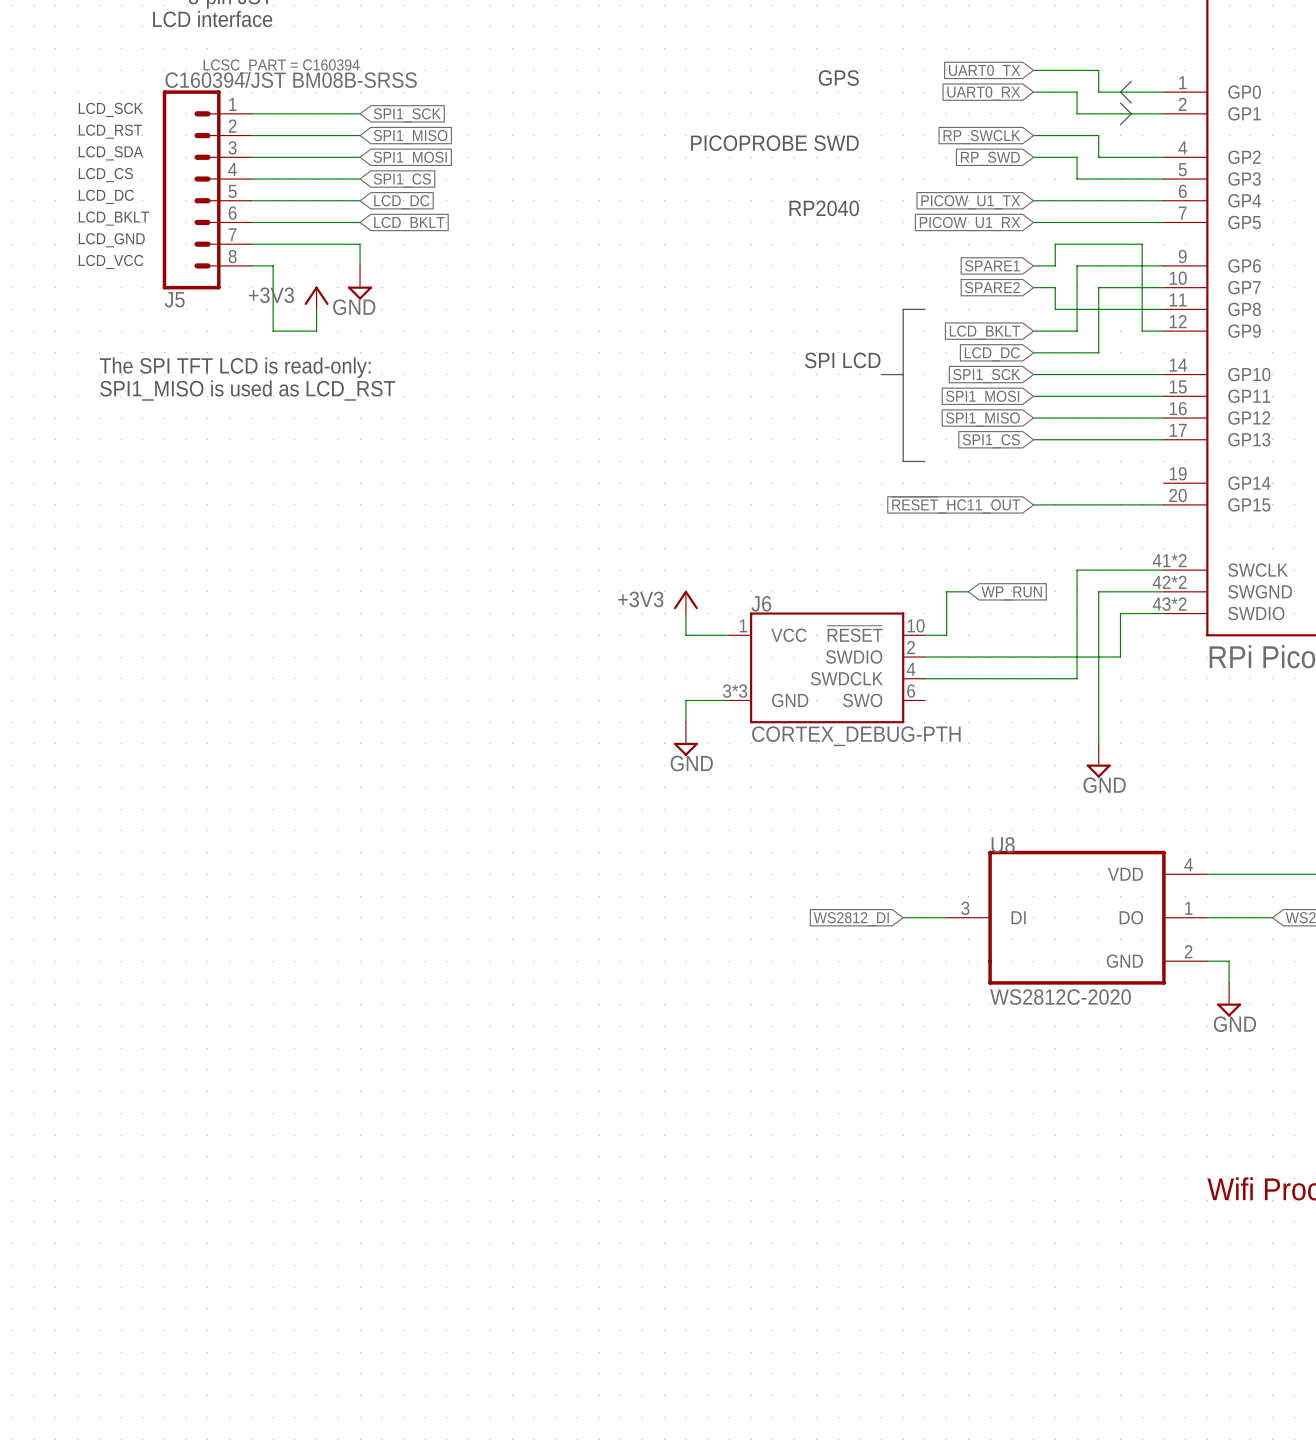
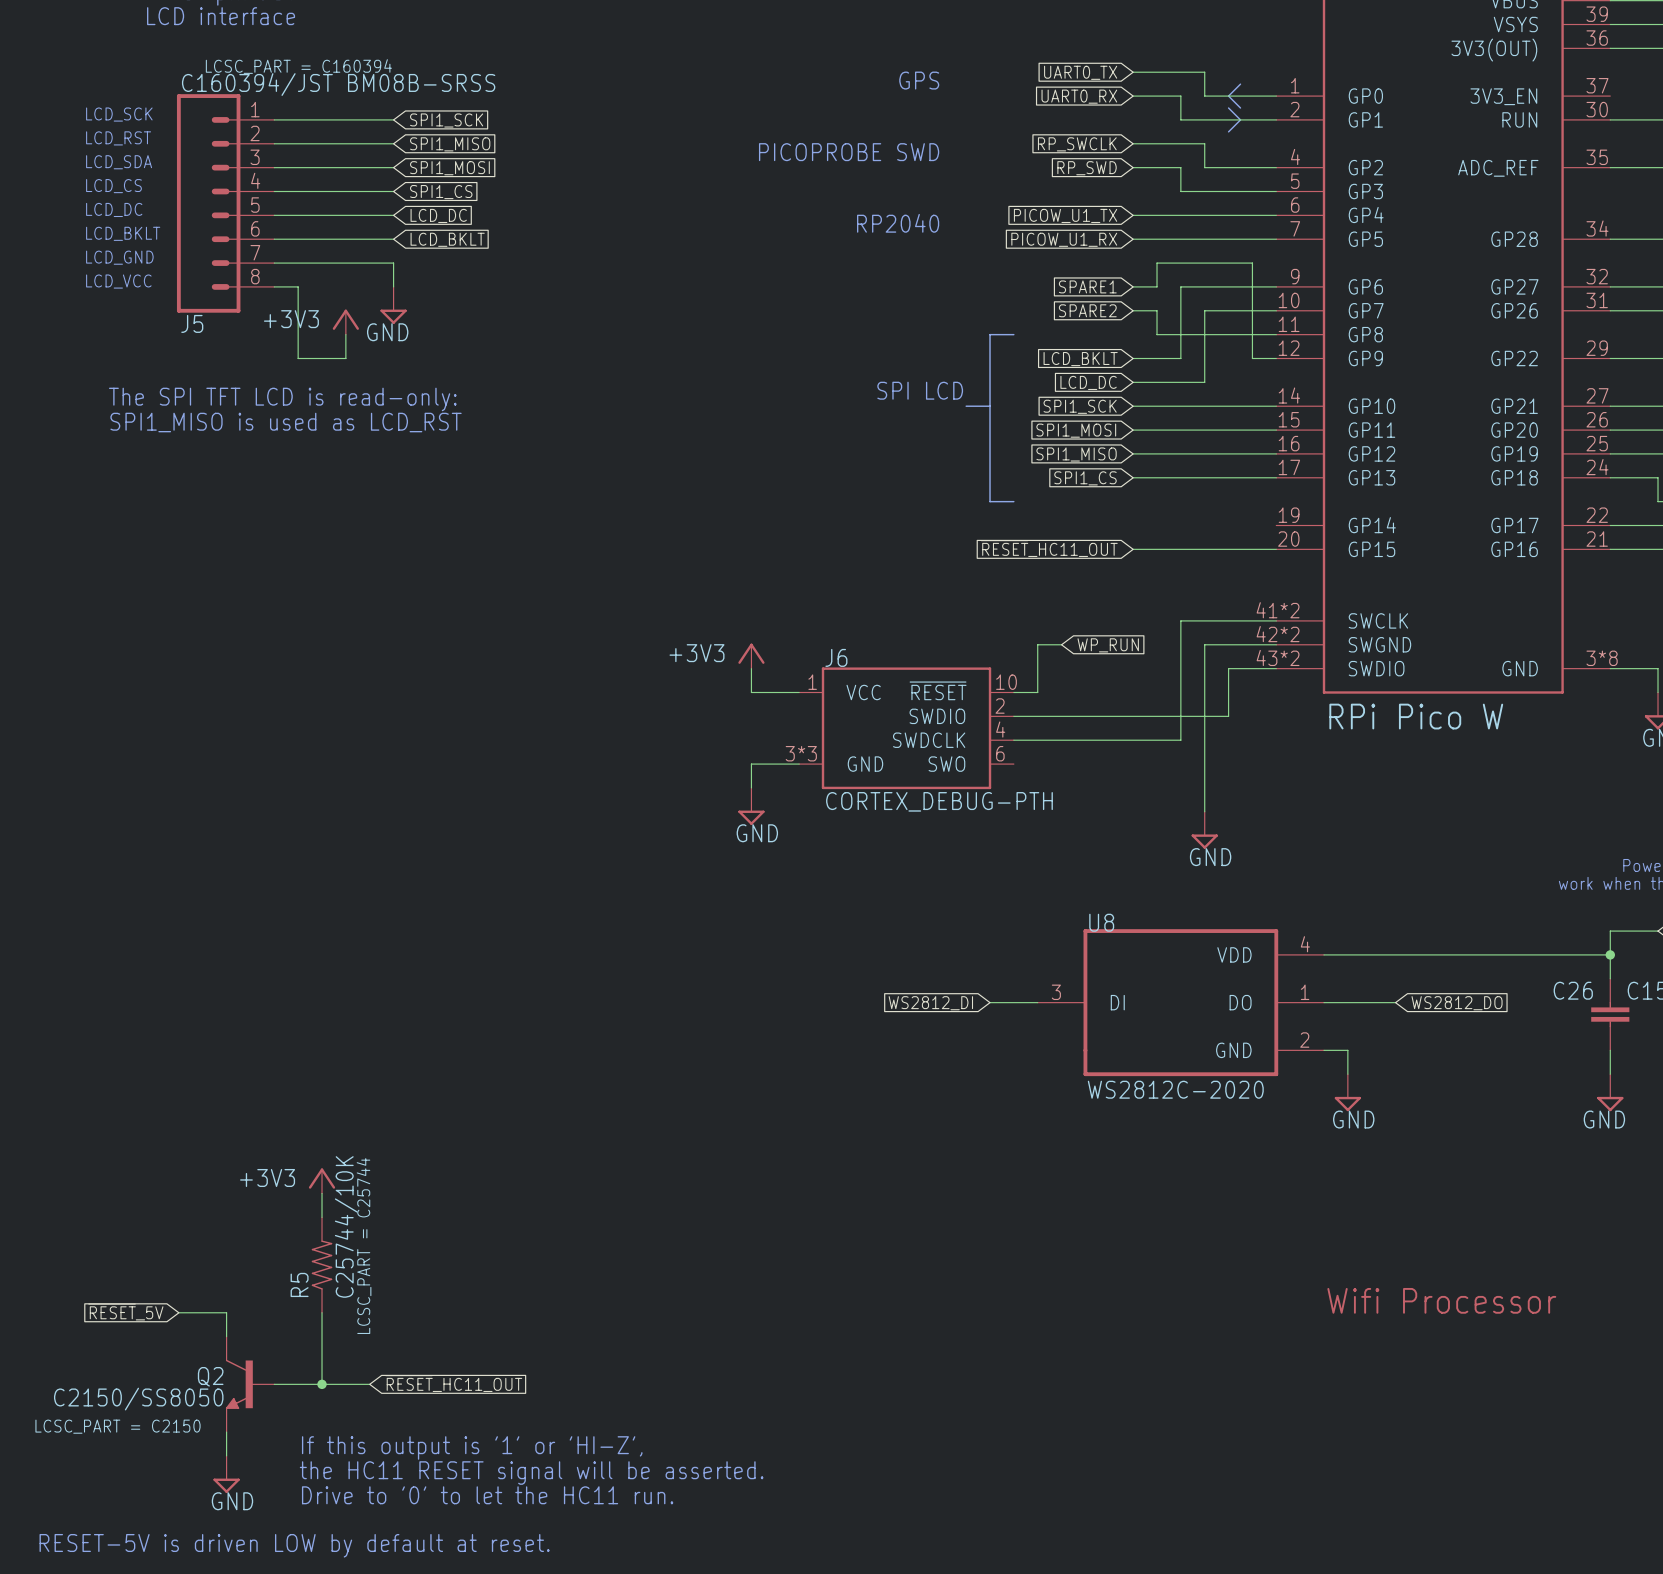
power symbol: none -> +3V3 (322, 1180)
wire: none -> (322, 1193) (322, 1217)
R5: none -> C25744/10K (322, 1265)
global label: none -> ~{RESET}_5V (125, 1311)
wire: none -> (178, 1312) (226, 1312) (226, 1336)
wire: none -> (322, 1312) (322, 1384)
Q2: none -> C2150/SS8050 (250, 1384)
wire: none -> (274, 1384) (369, 1384)
junction: none -> (322, 1384)
global label: none -> ~{RESET}_HC11_OUT (453, 1383)
wire: none -> (226, 1432) (226, 1455)
text: none -> If this output is '1' or 'HI-Z', (472, 1447)
text: none -> the HC11 RESET signal will be asserted. (531, 1473)
power symbol: none -> GND (226, 1474)
text: none -> Drive to '0' to let the HC11 run. (487, 1495)
text: none -> RESET-5V is driven LOW by default at reset. (294, 1545)

